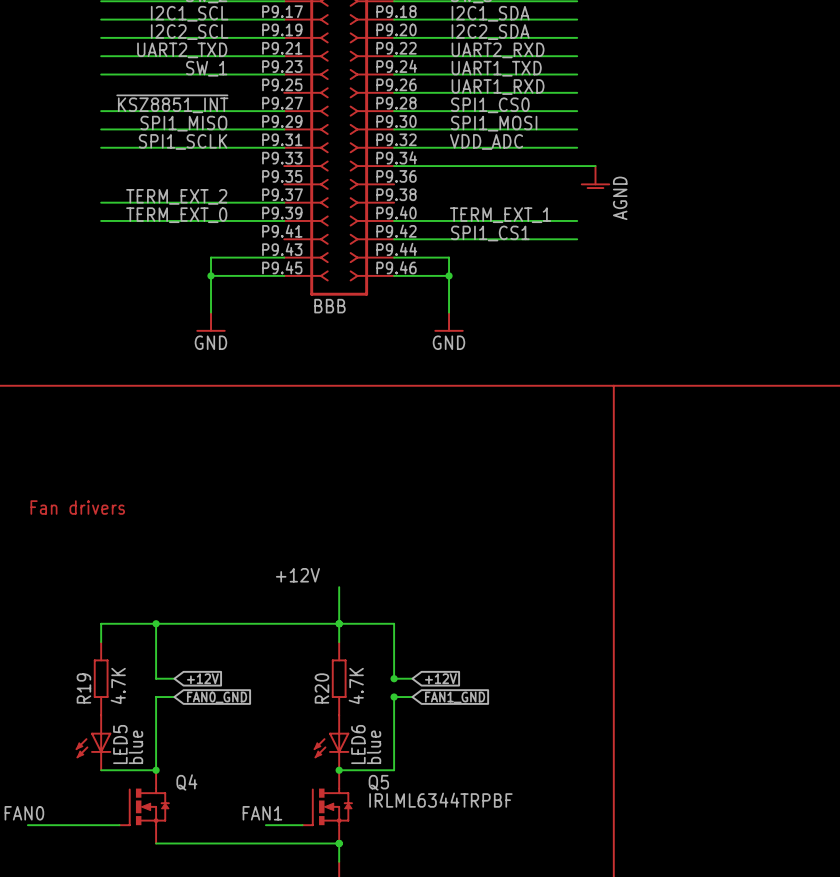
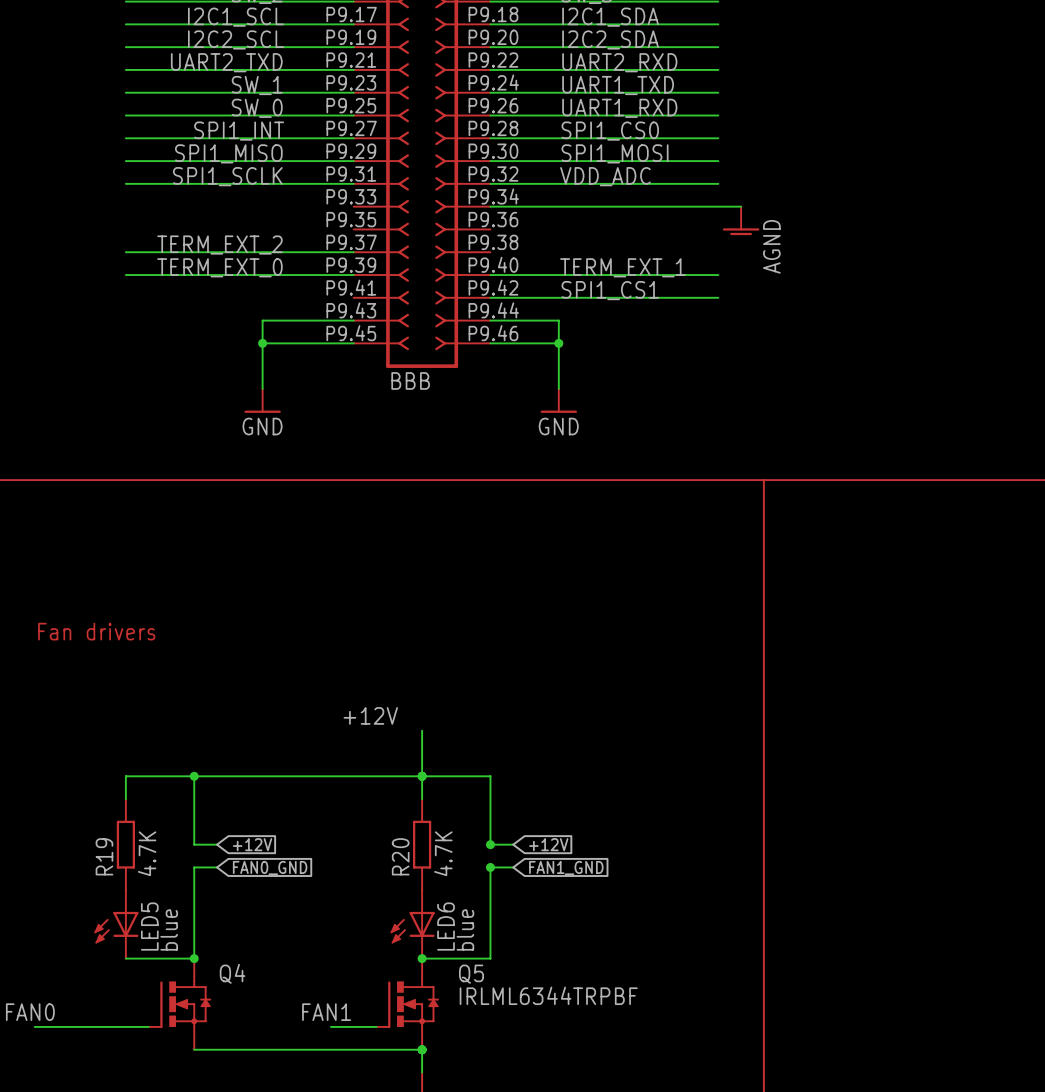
label: none -> SW_0 (257, 108)
wire: none -> (125, 115) (353, 115)
label: ~{KSZ8851_INT} (172, 103) -> SPI1_INT (239, 131)

